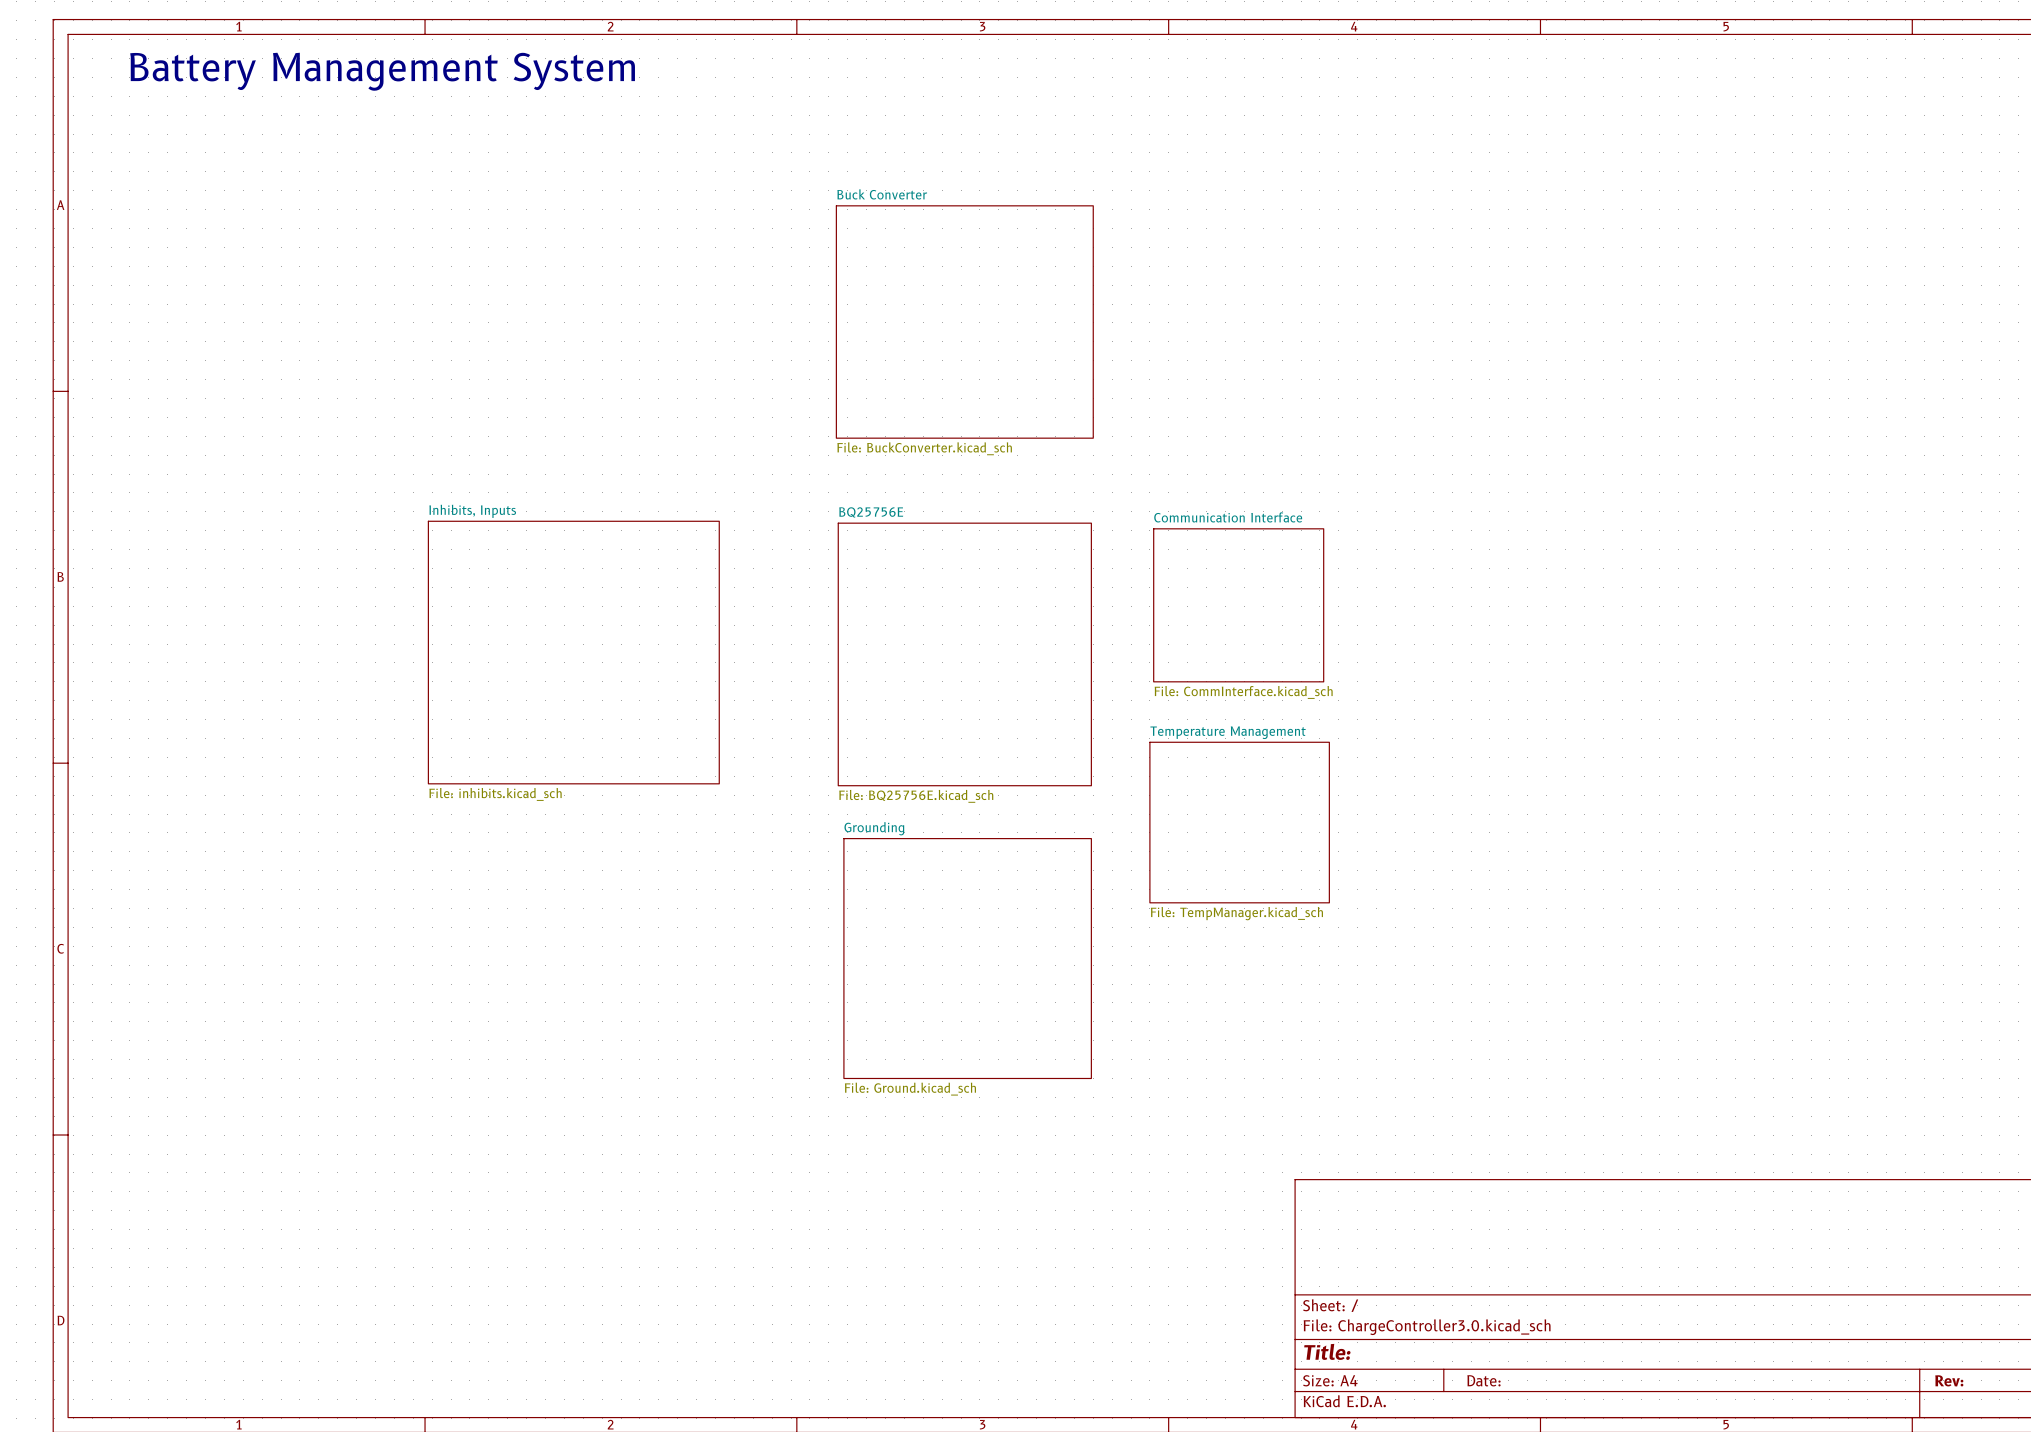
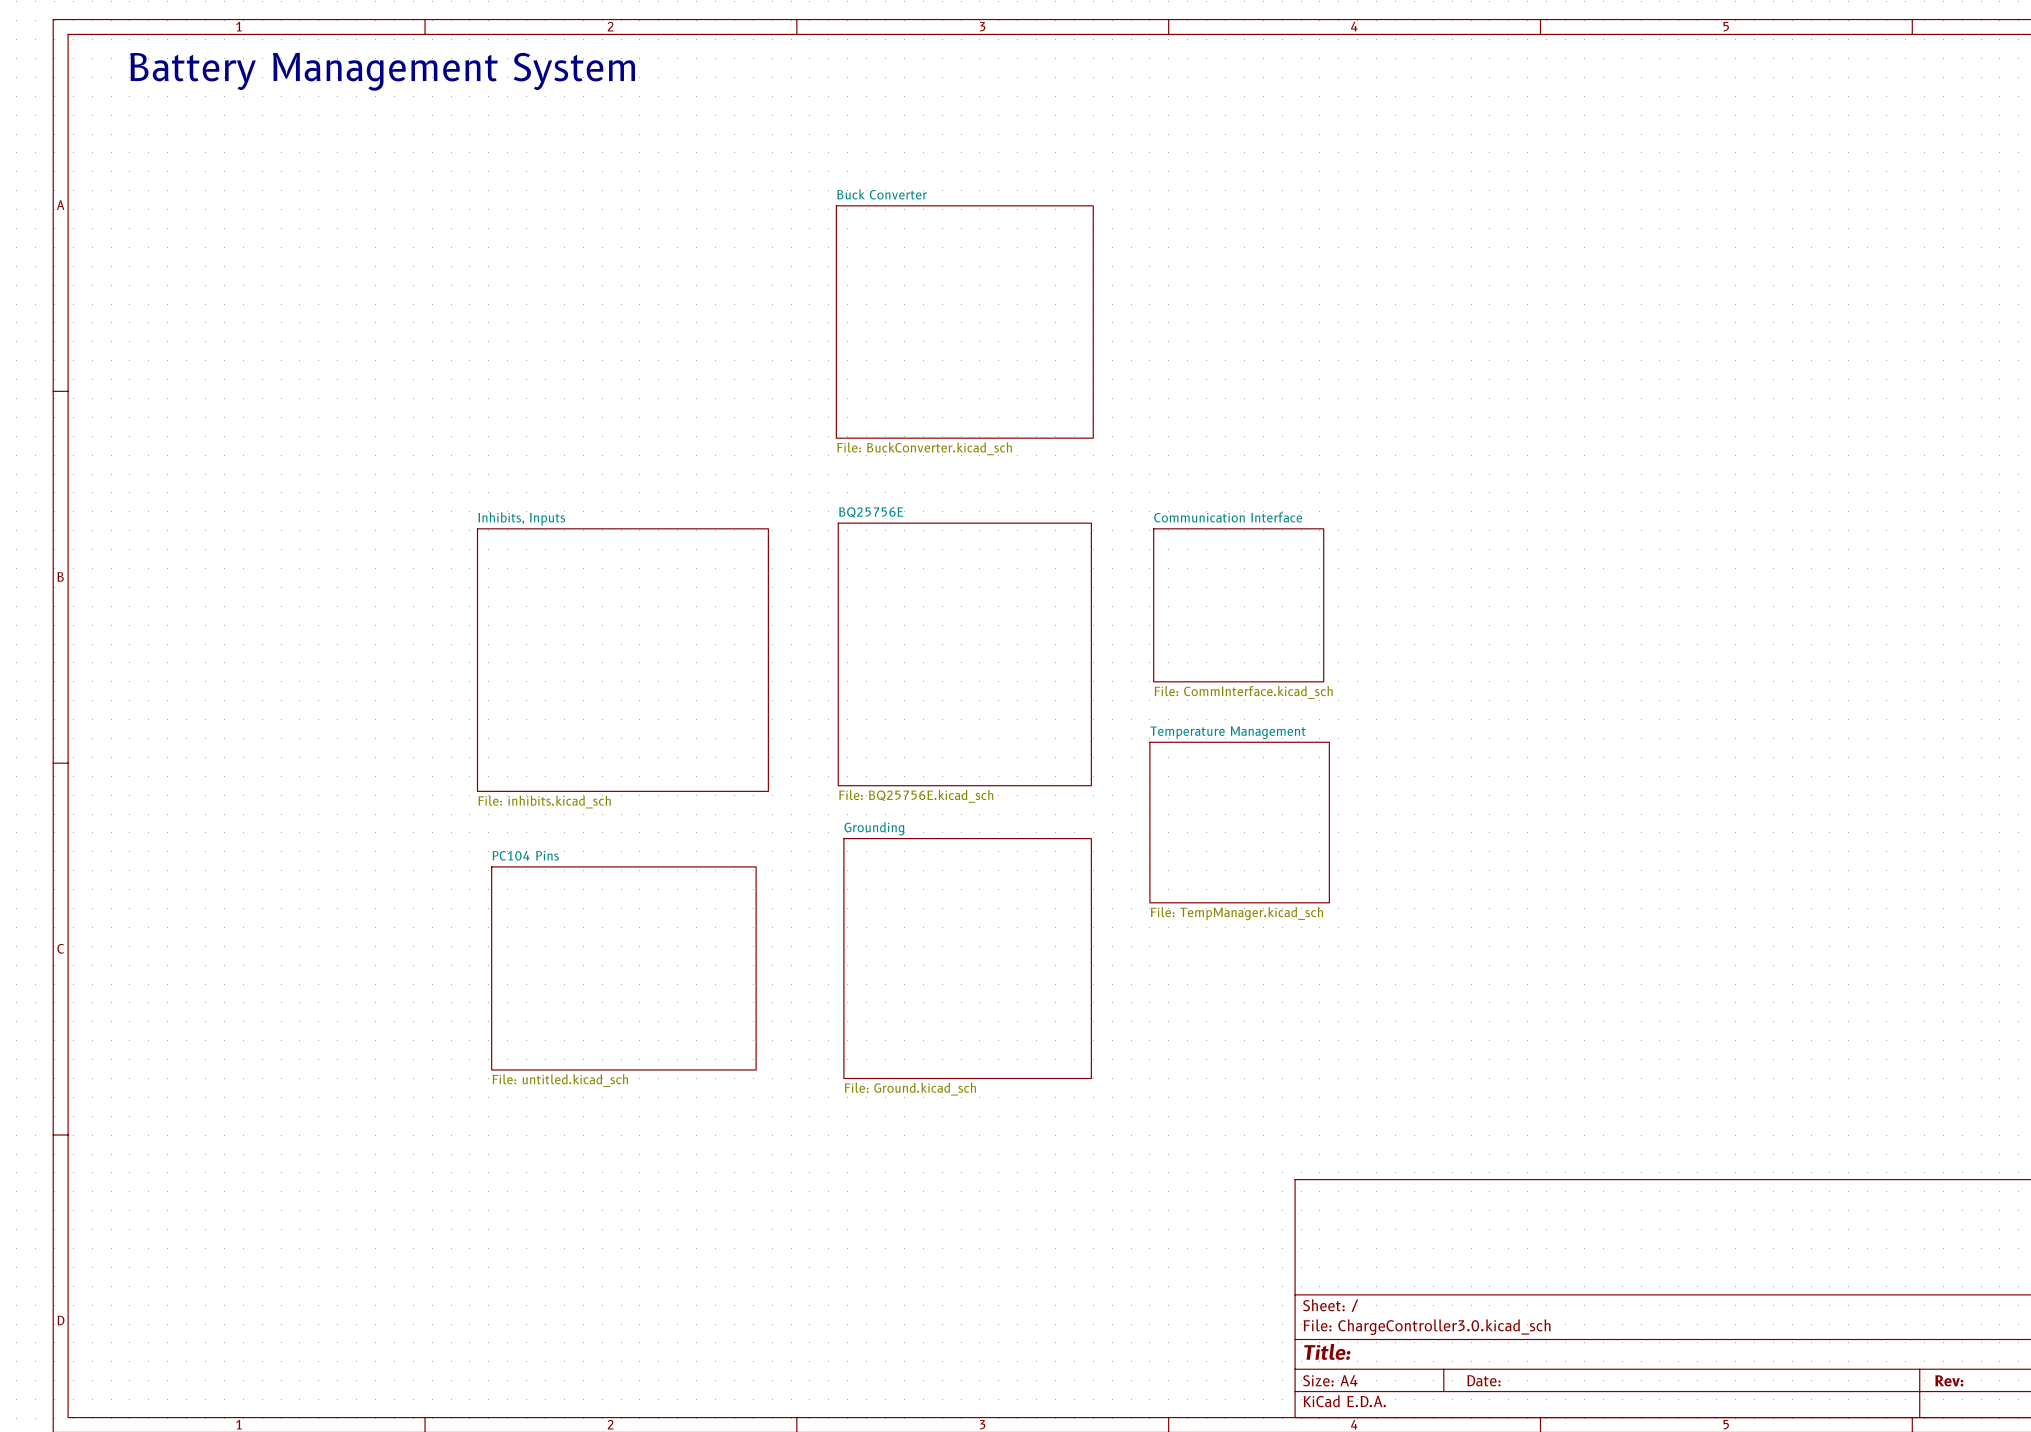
sheet Inhibits, Inputs position: (573, 652) -> (622, 660)
sheet PC104 Pins: none -> File: untitled.kicad_sch (623, 968)

